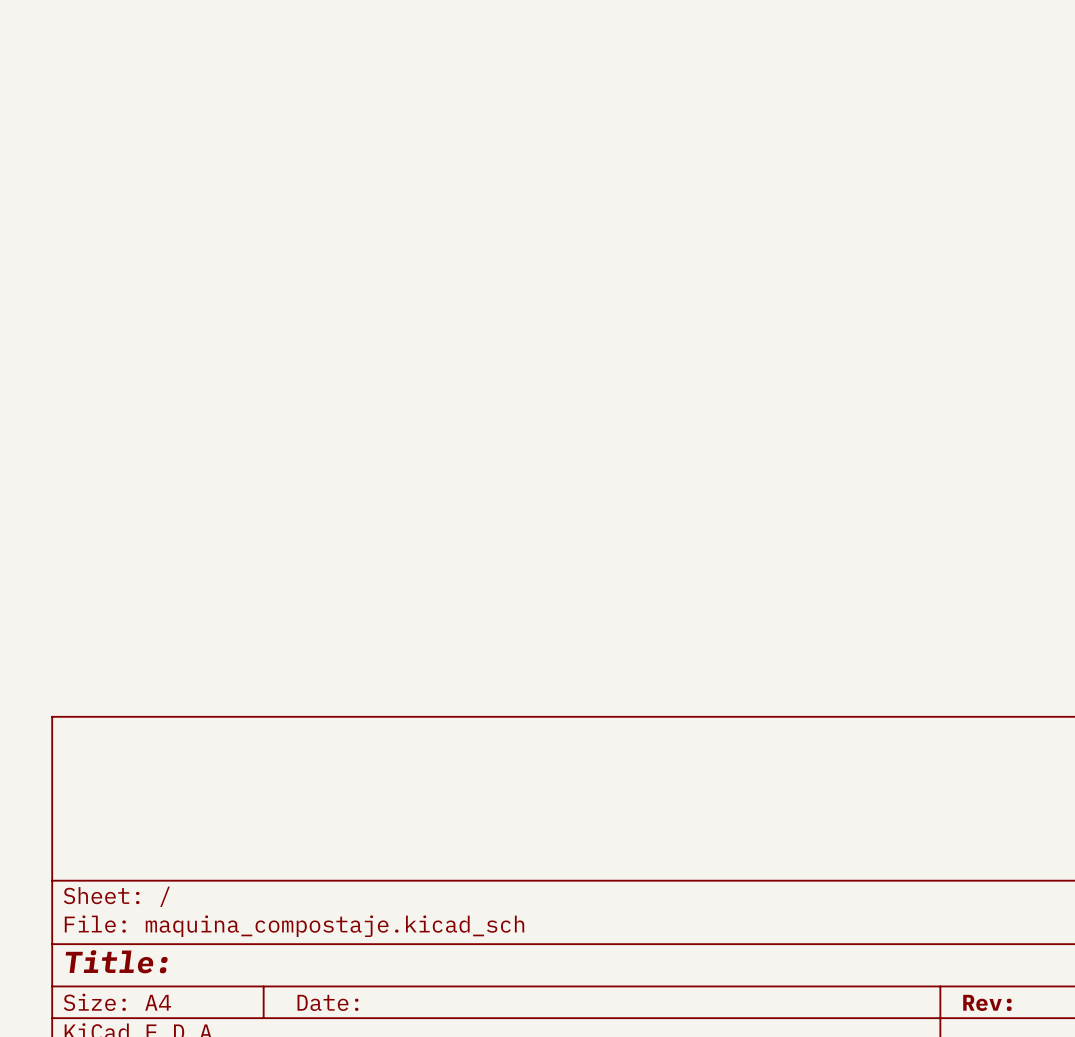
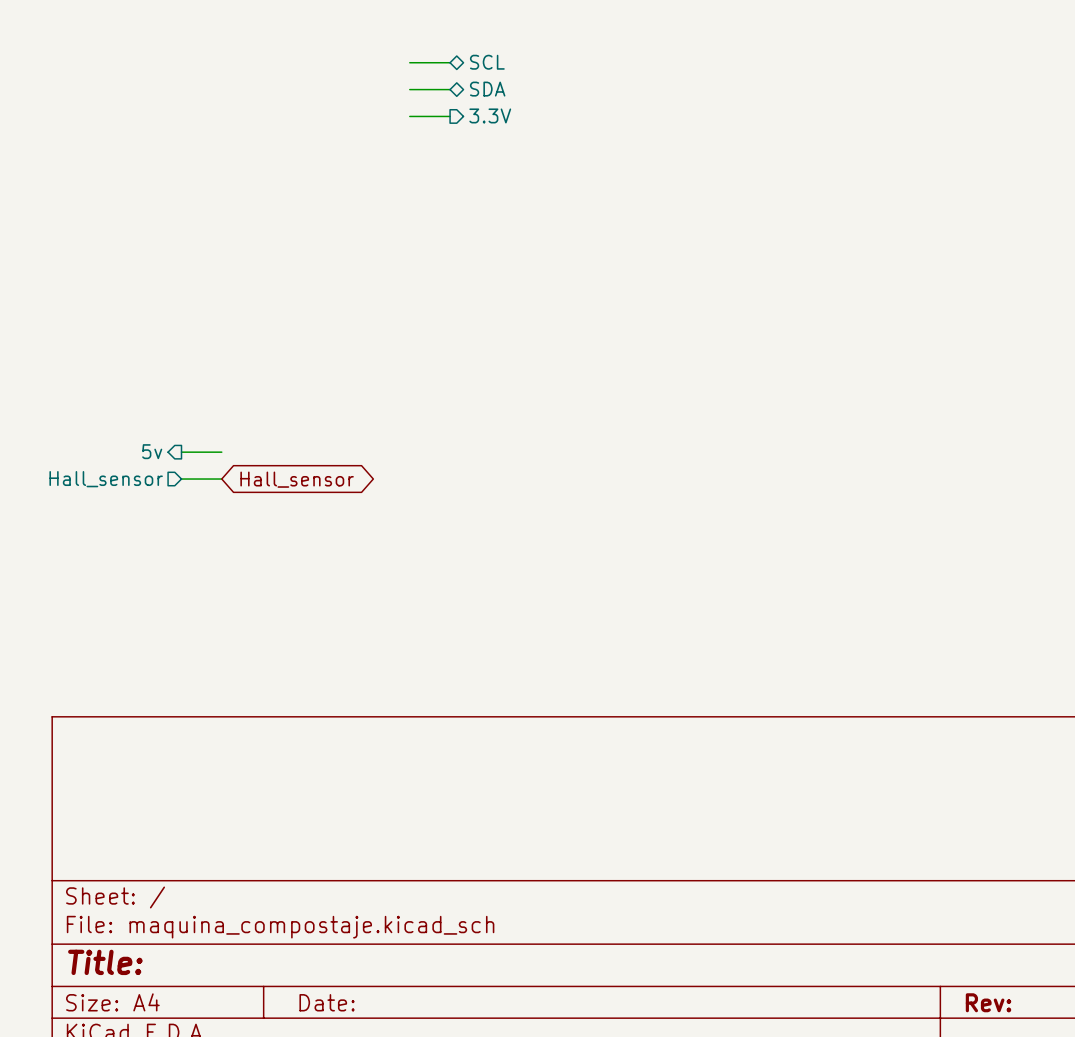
wire: none -> (409, 62) (450, 62)
sheet pin: none -> SCL (487, 62)
wire: none -> (409, 89) (450, 89)
sheet pin: none -> SDA (487, 89)
sheet pin: none -> 3.3V (490, 115)
wire: none -> (409, 116) (450, 116)
sheet pin: none -> 5v (152, 451)
wire: none -> (181, 452) (221, 452)
sheet pin: none -> Hall_sensor (106, 479)
wire: none -> (181, 479) (221, 479)
global label: none -> Hall_sensor (297, 479)

